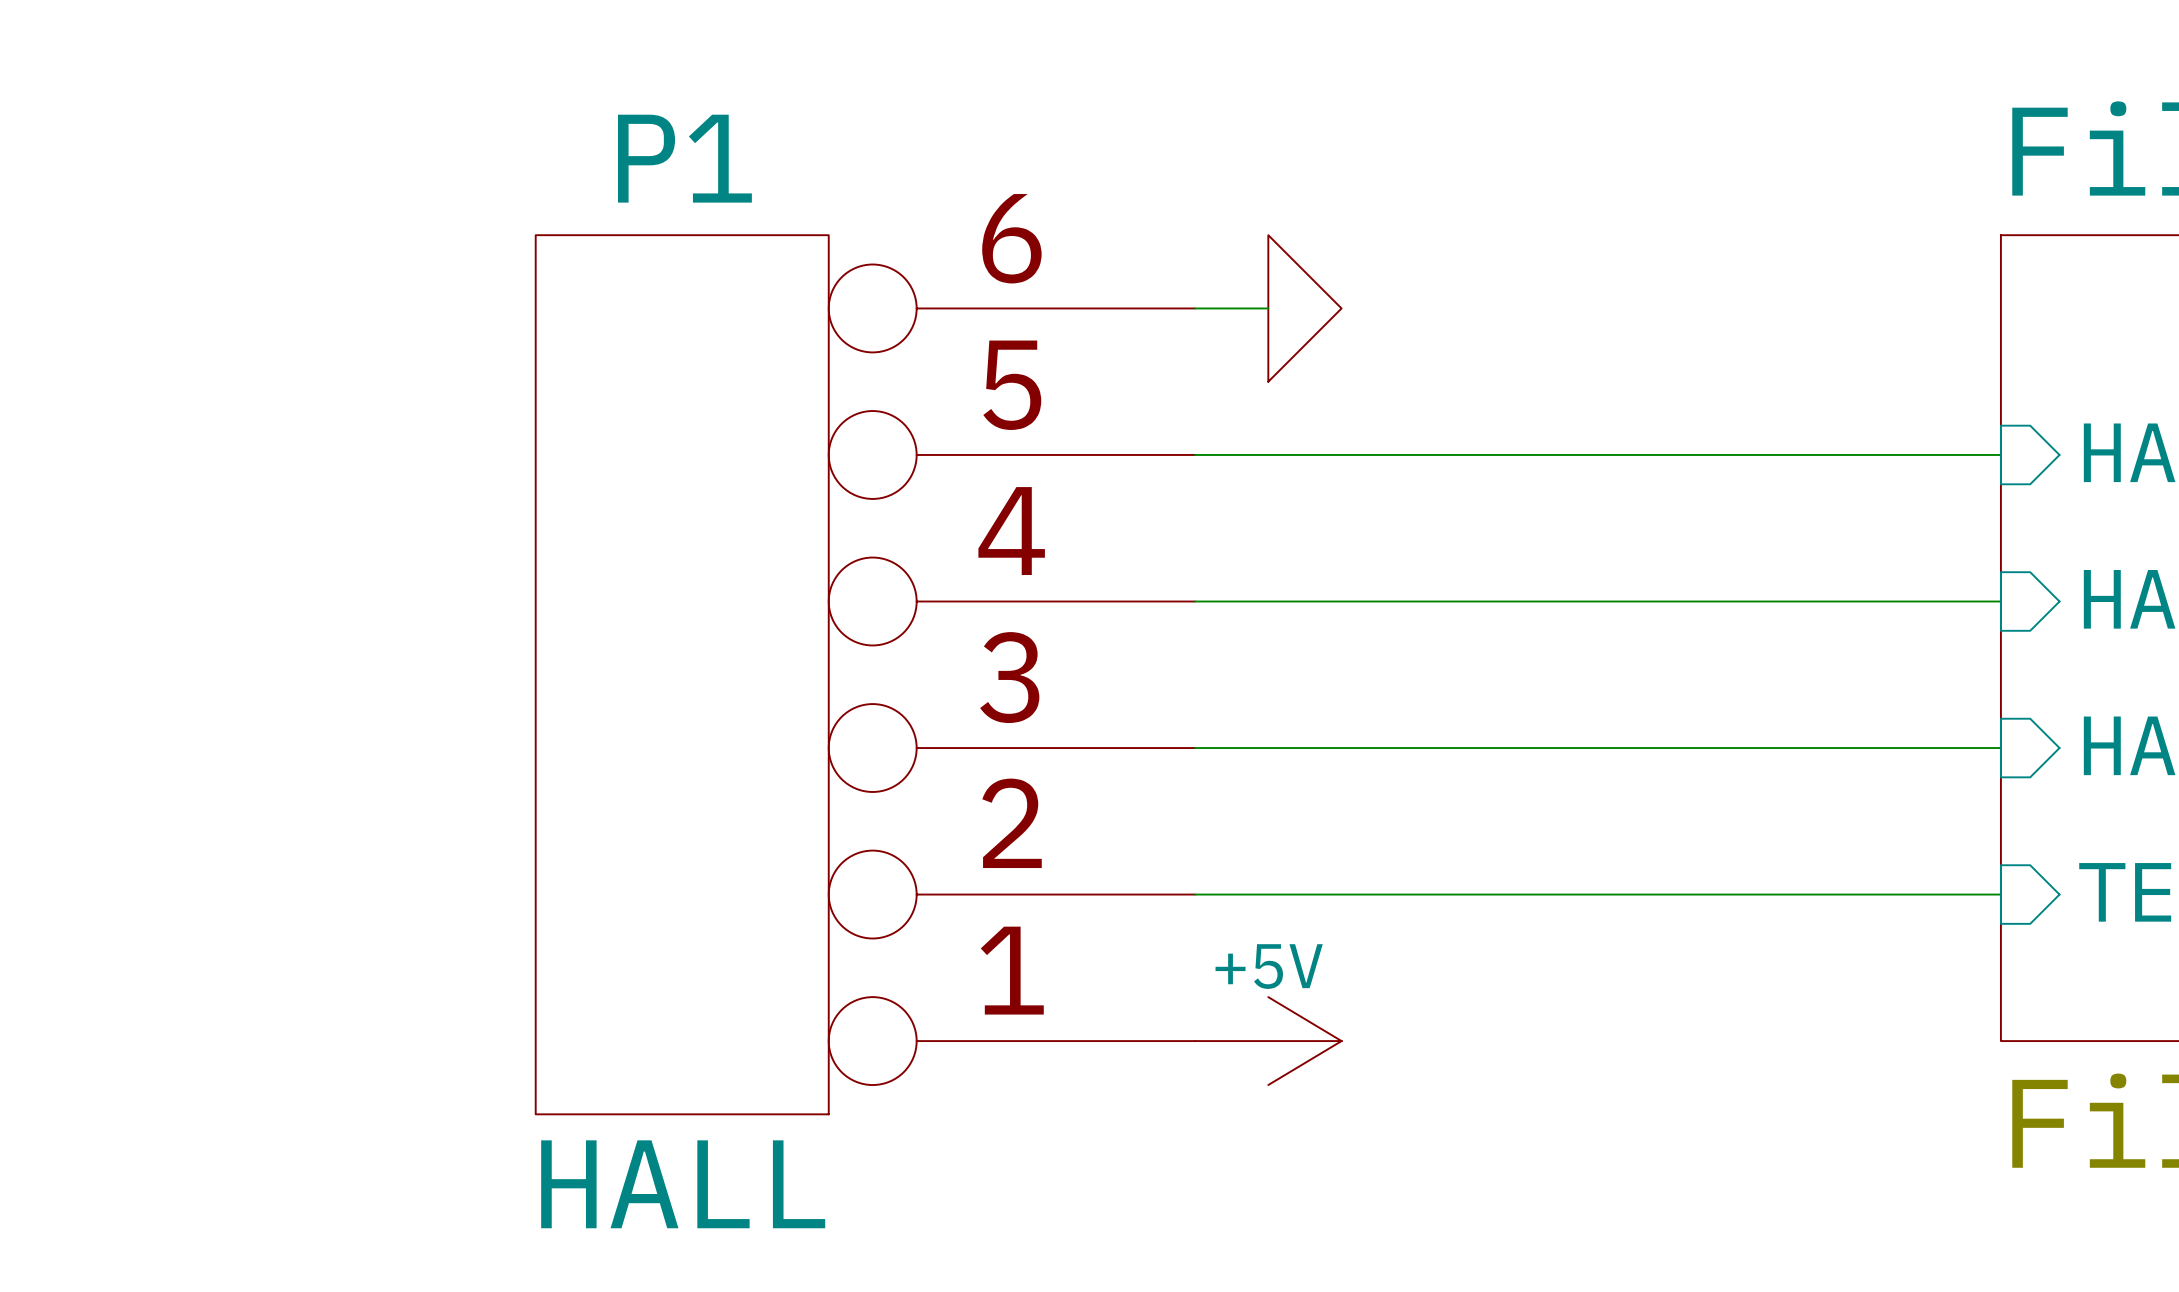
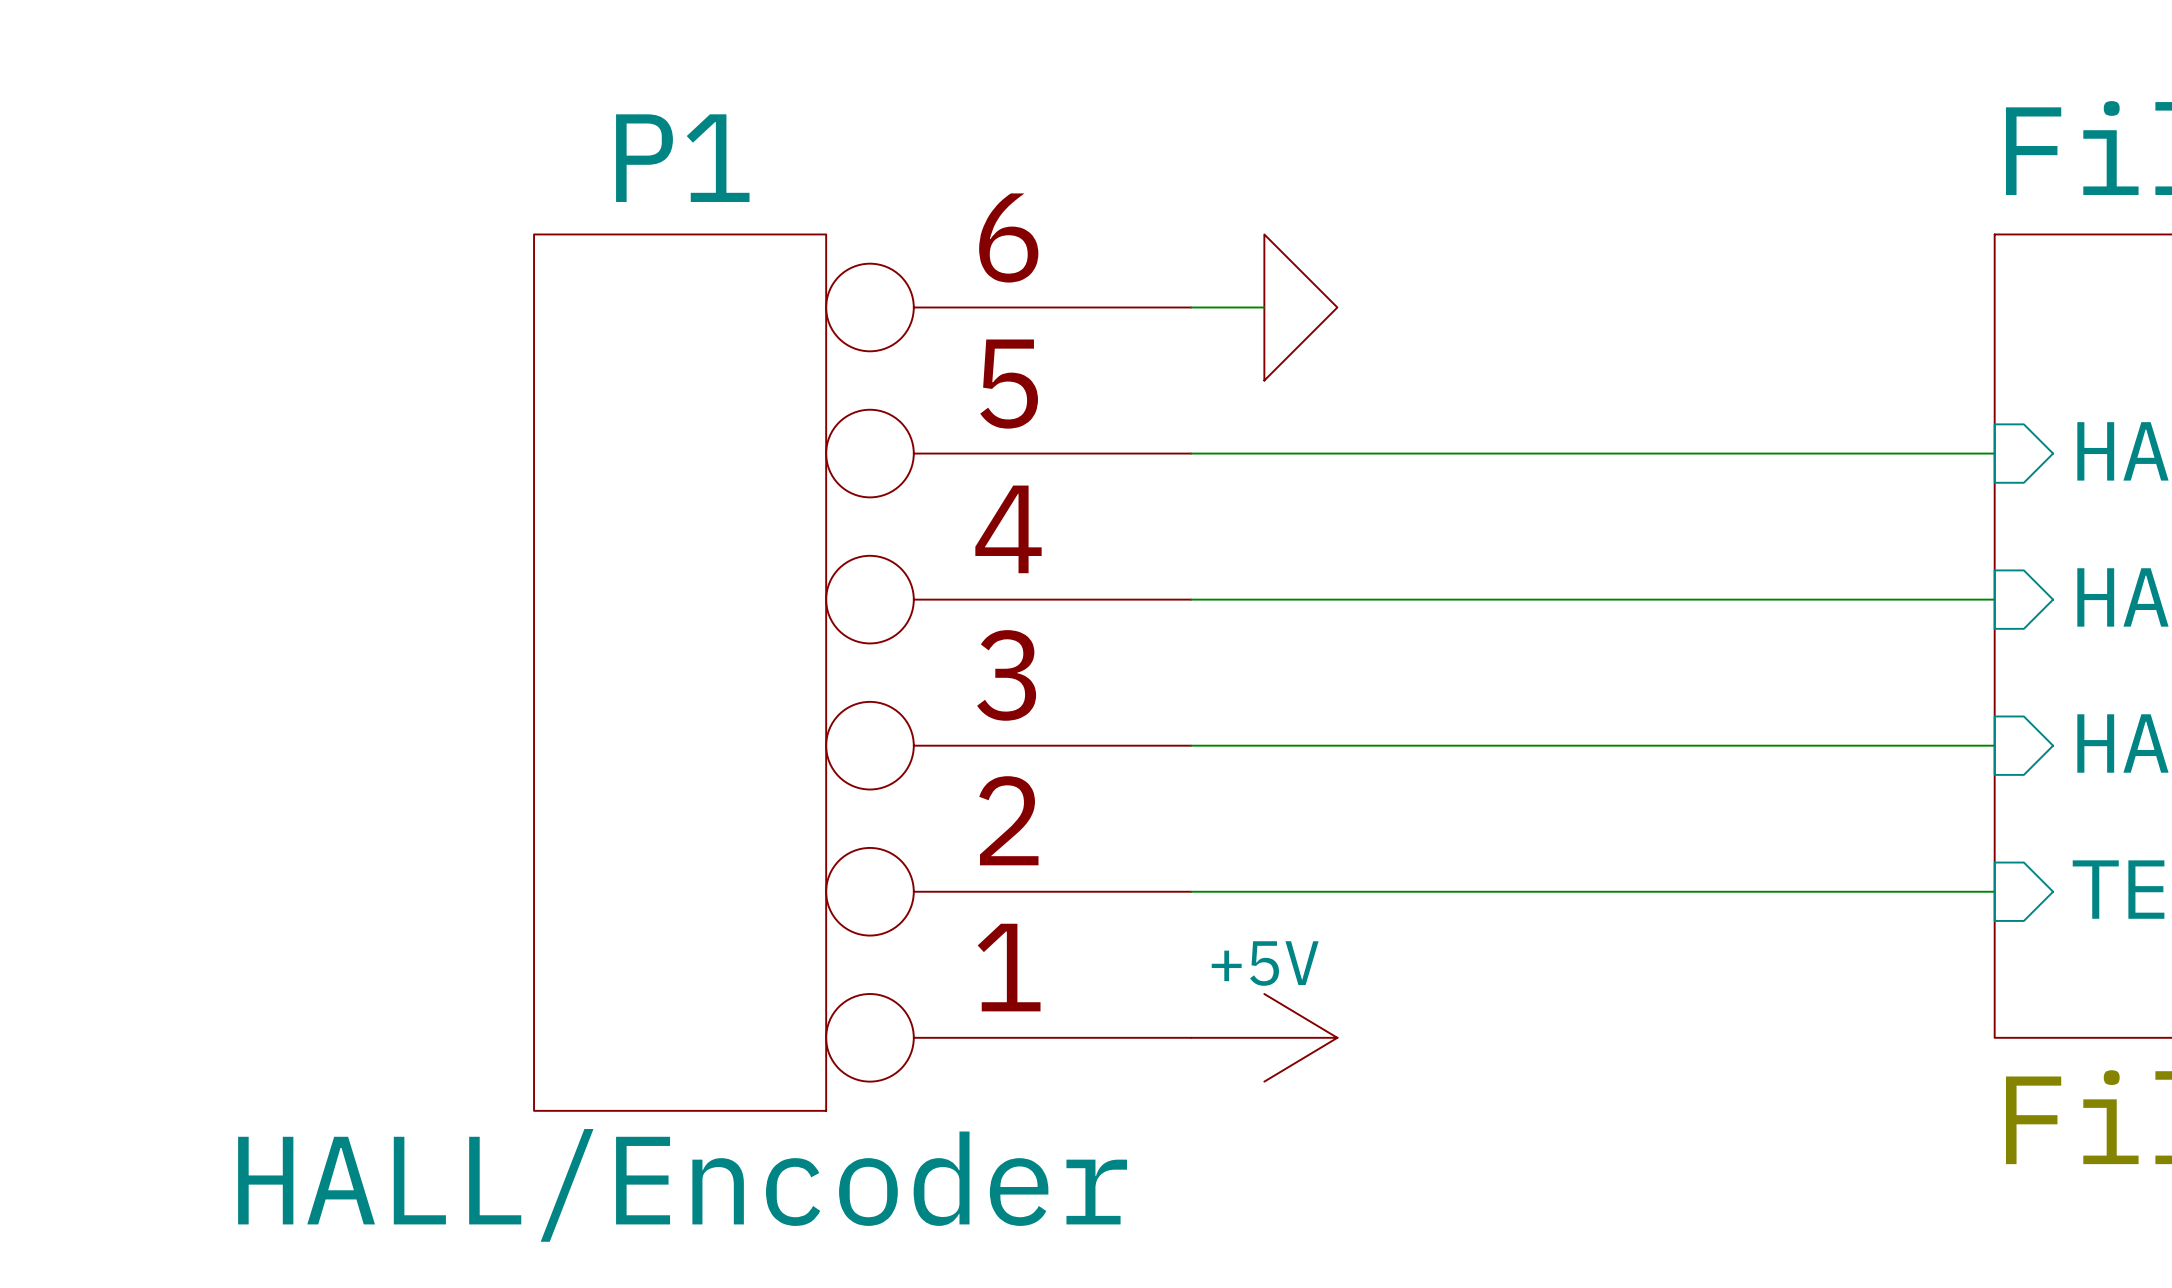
P1 value: HALL (683, 1184) -> HALL/Encoder (682, 1185)

